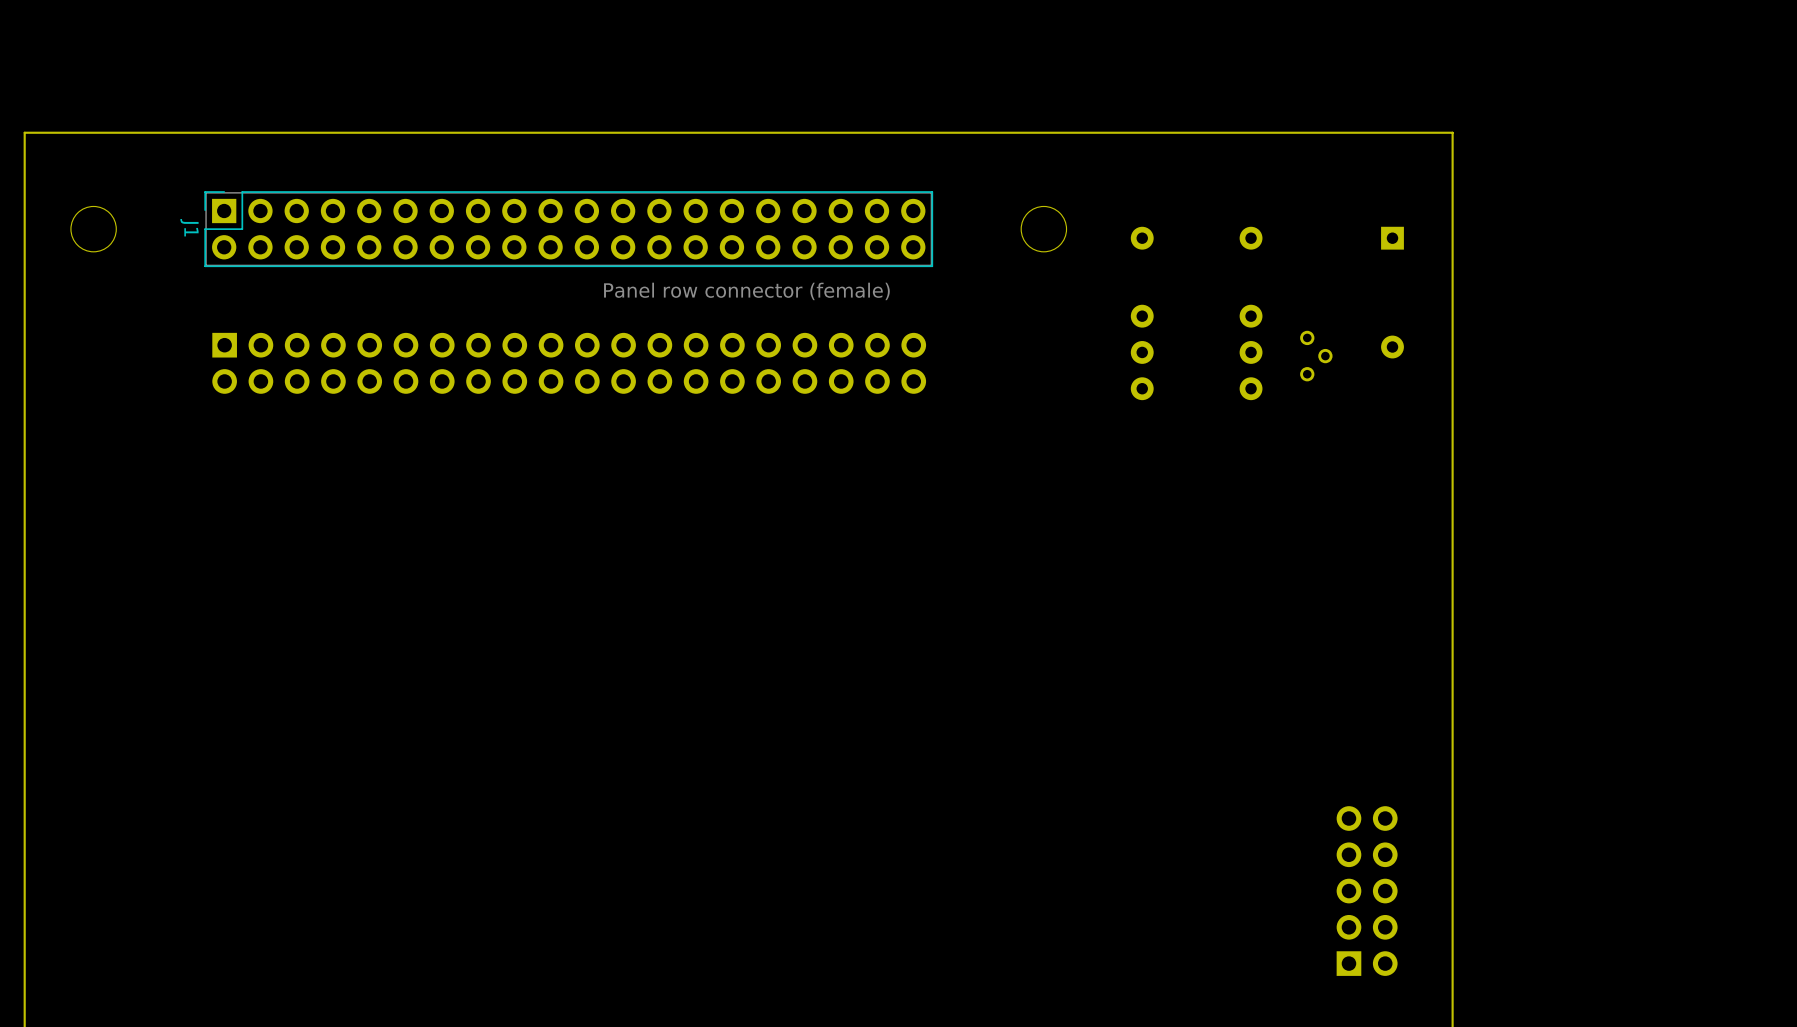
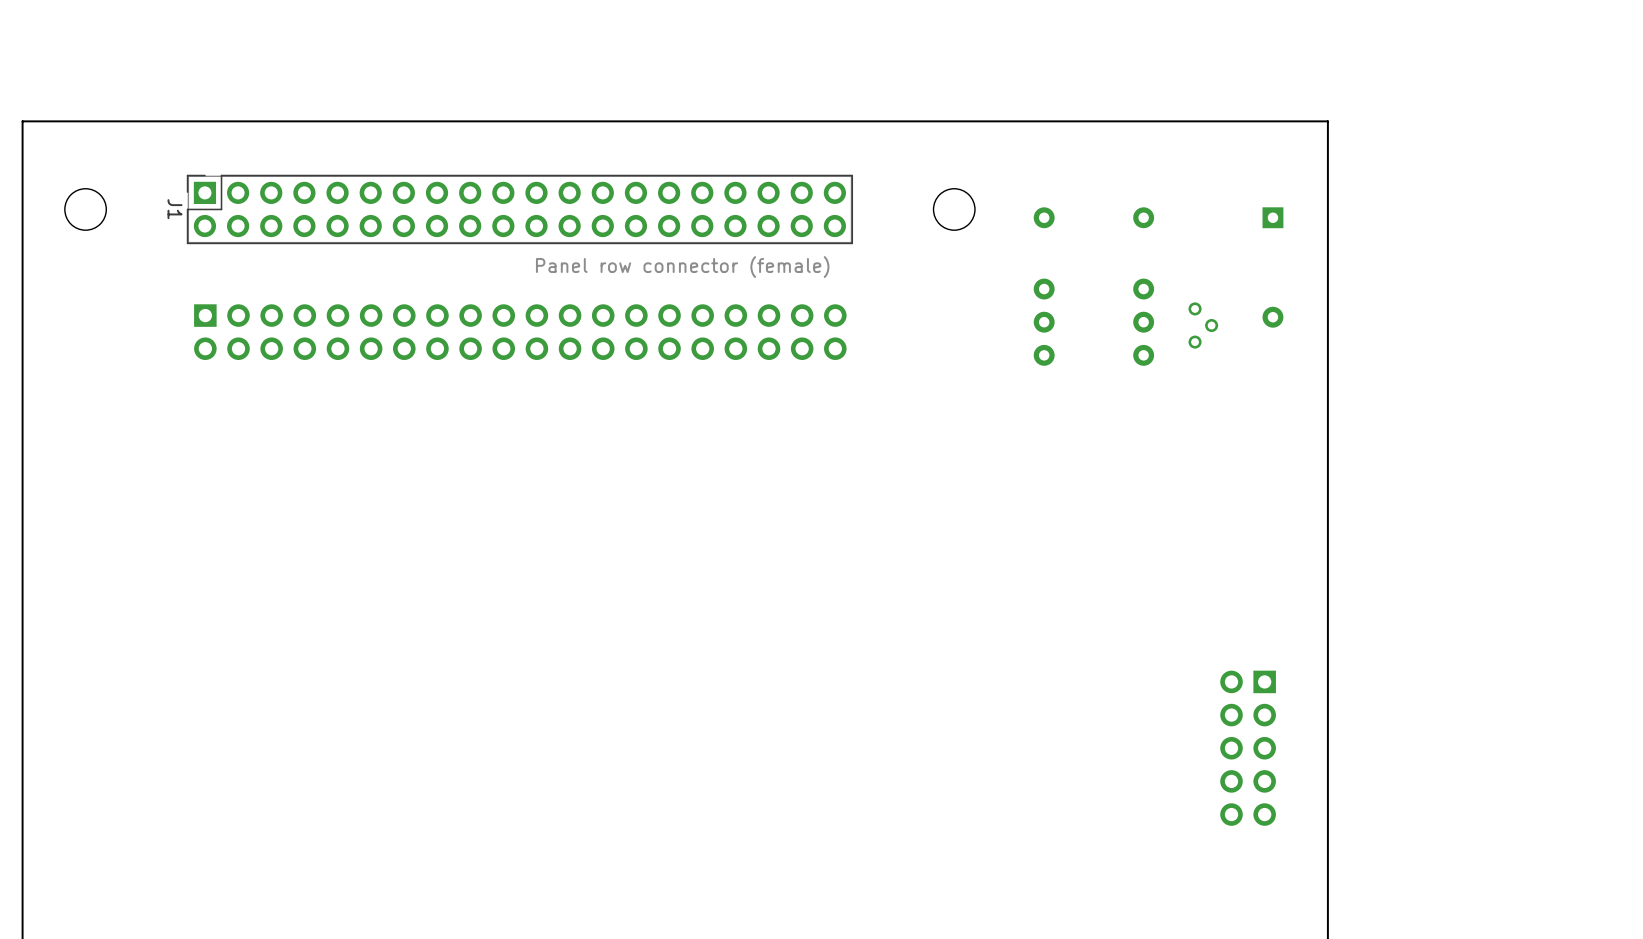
part rotation: 0° (1367, 891) -> 180° (1248, 748)

